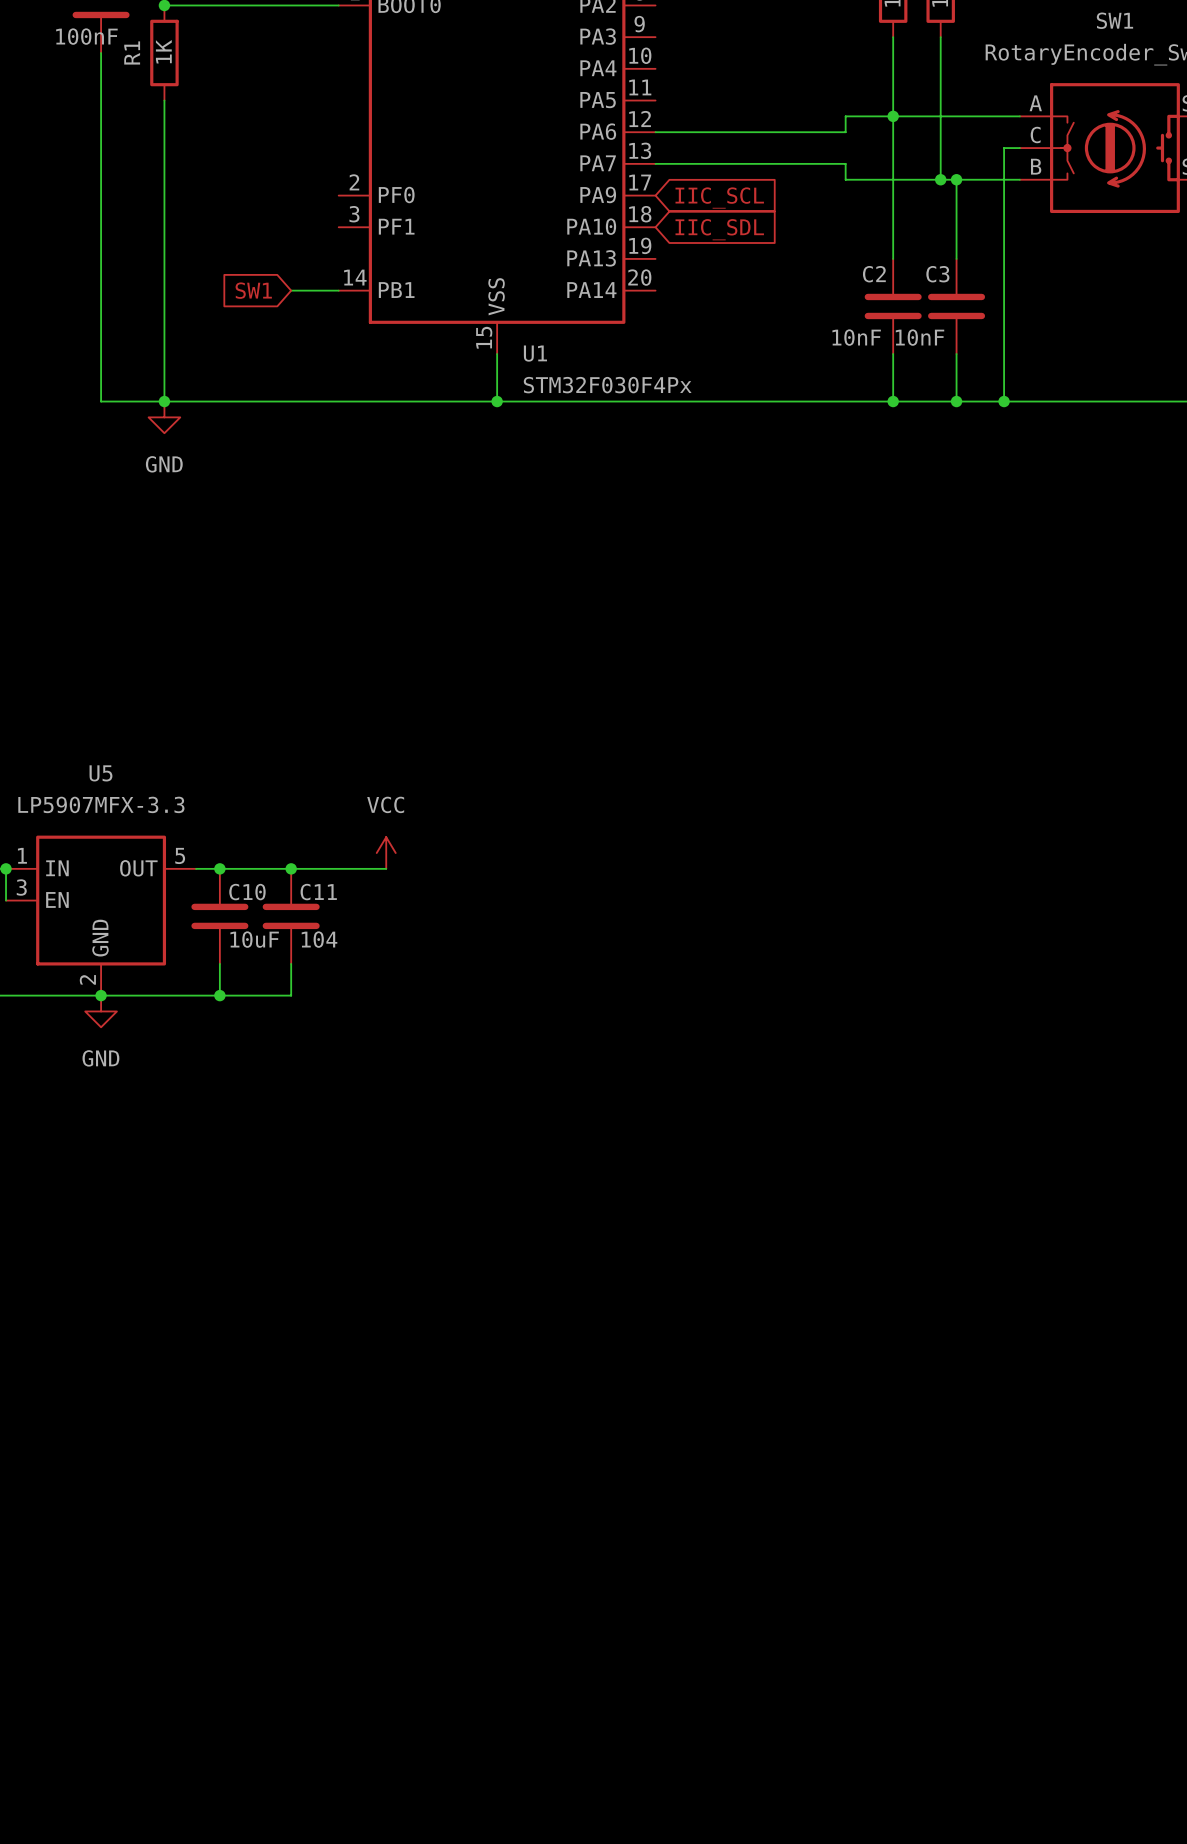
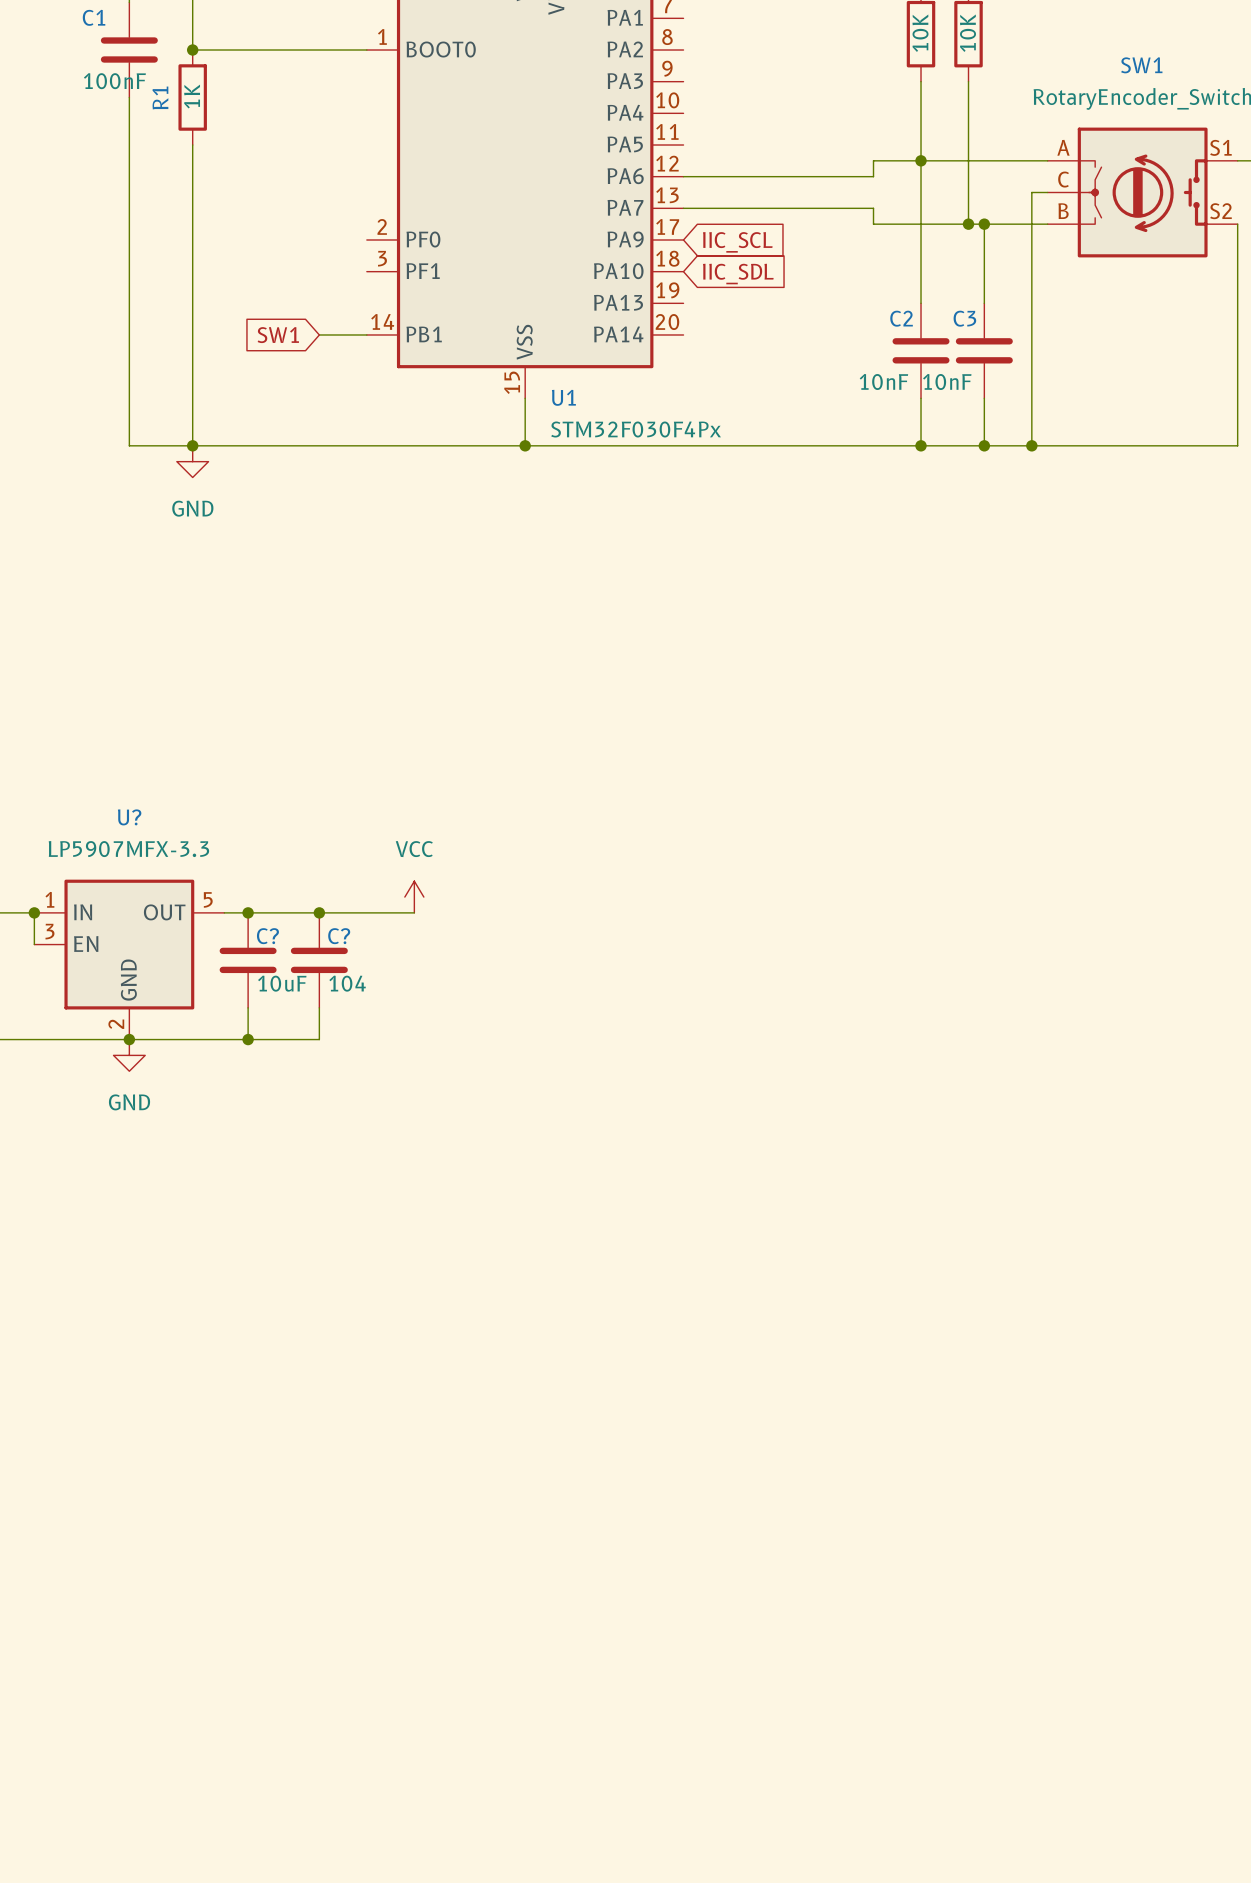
U5 name: U5 (100, 773) -> U? (129, 817)
C10 name: C10 (247, 892) -> C? (267, 936)
C11 name: C11 (318, 892) -> C? (339, 936)

